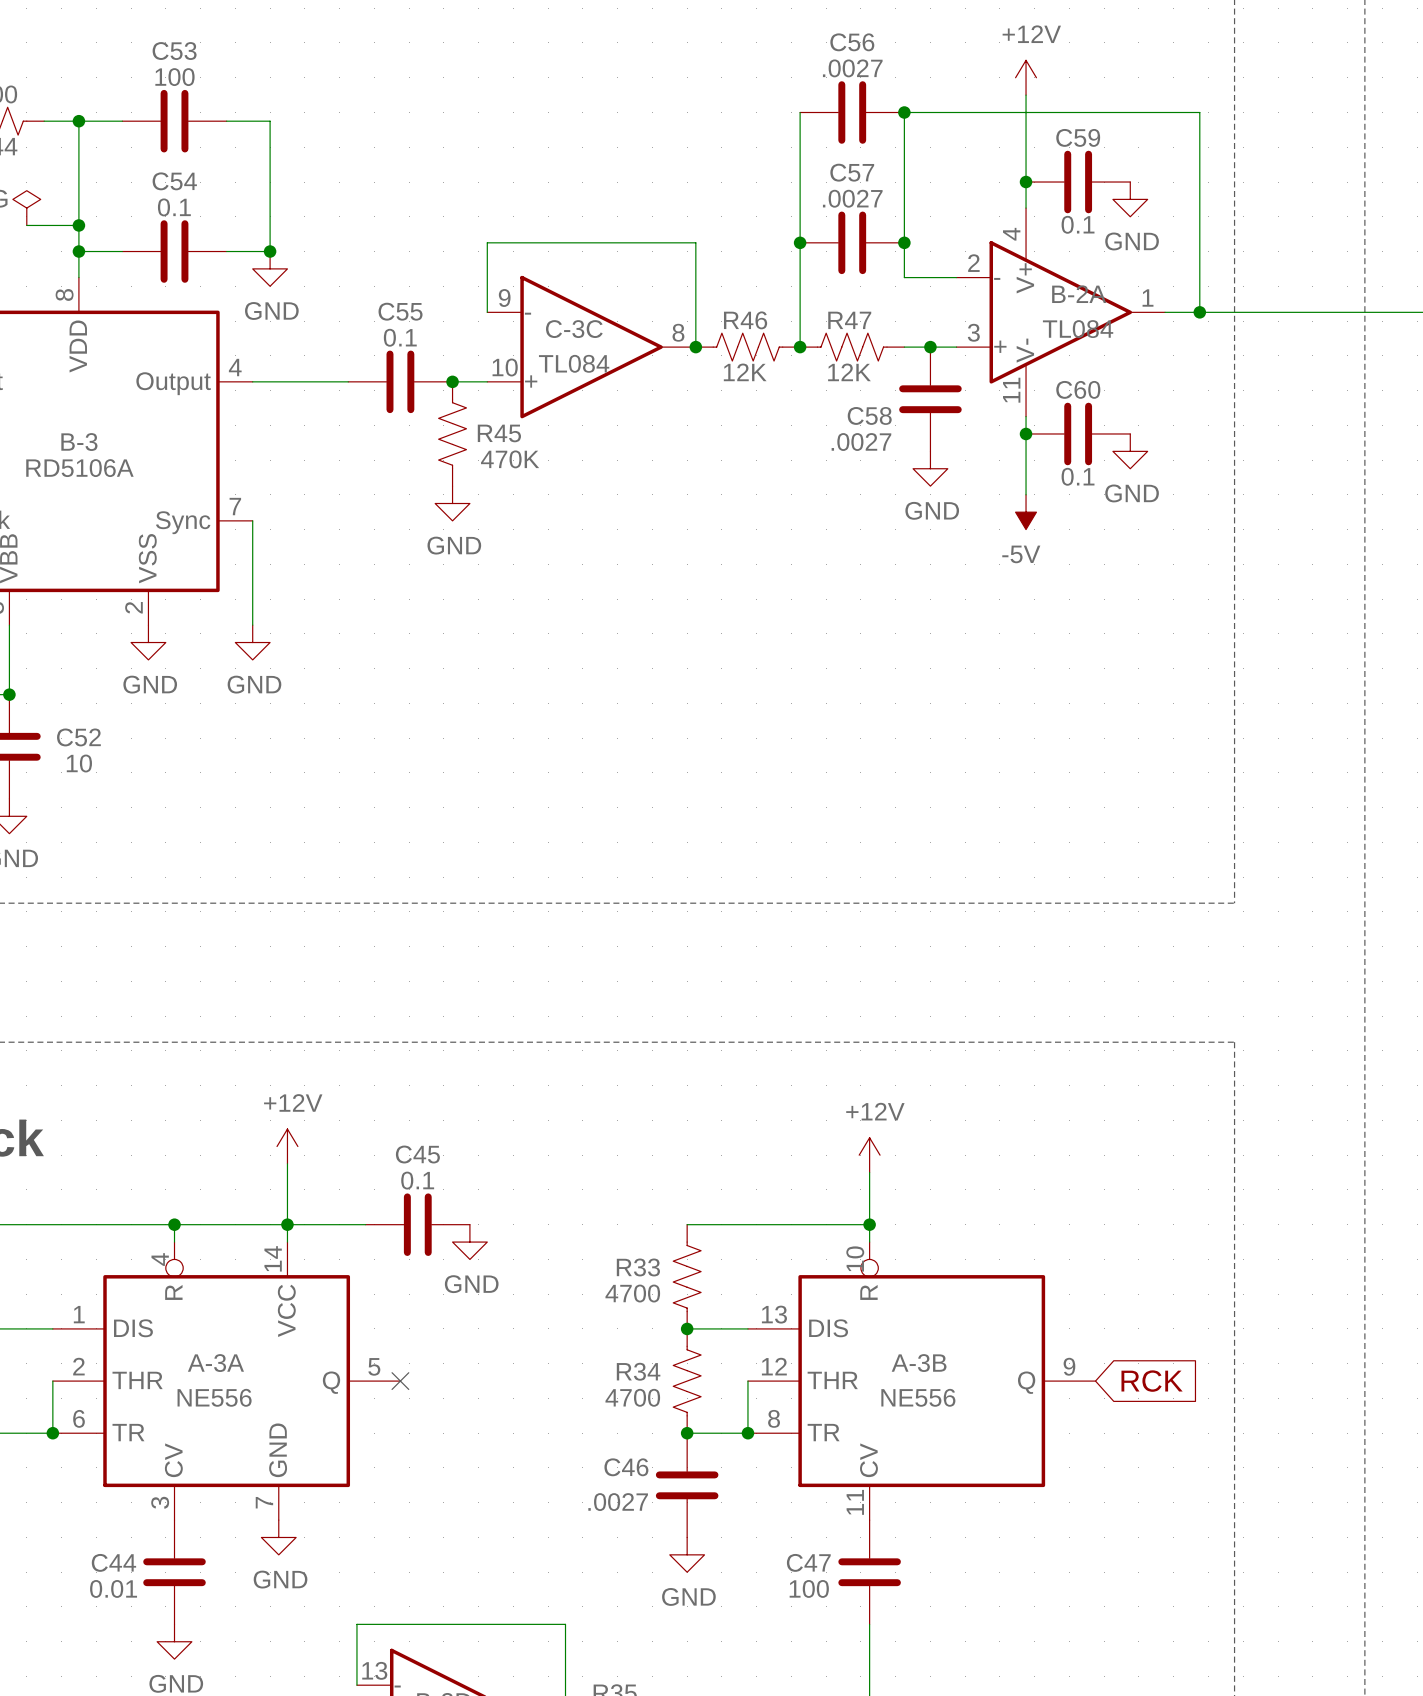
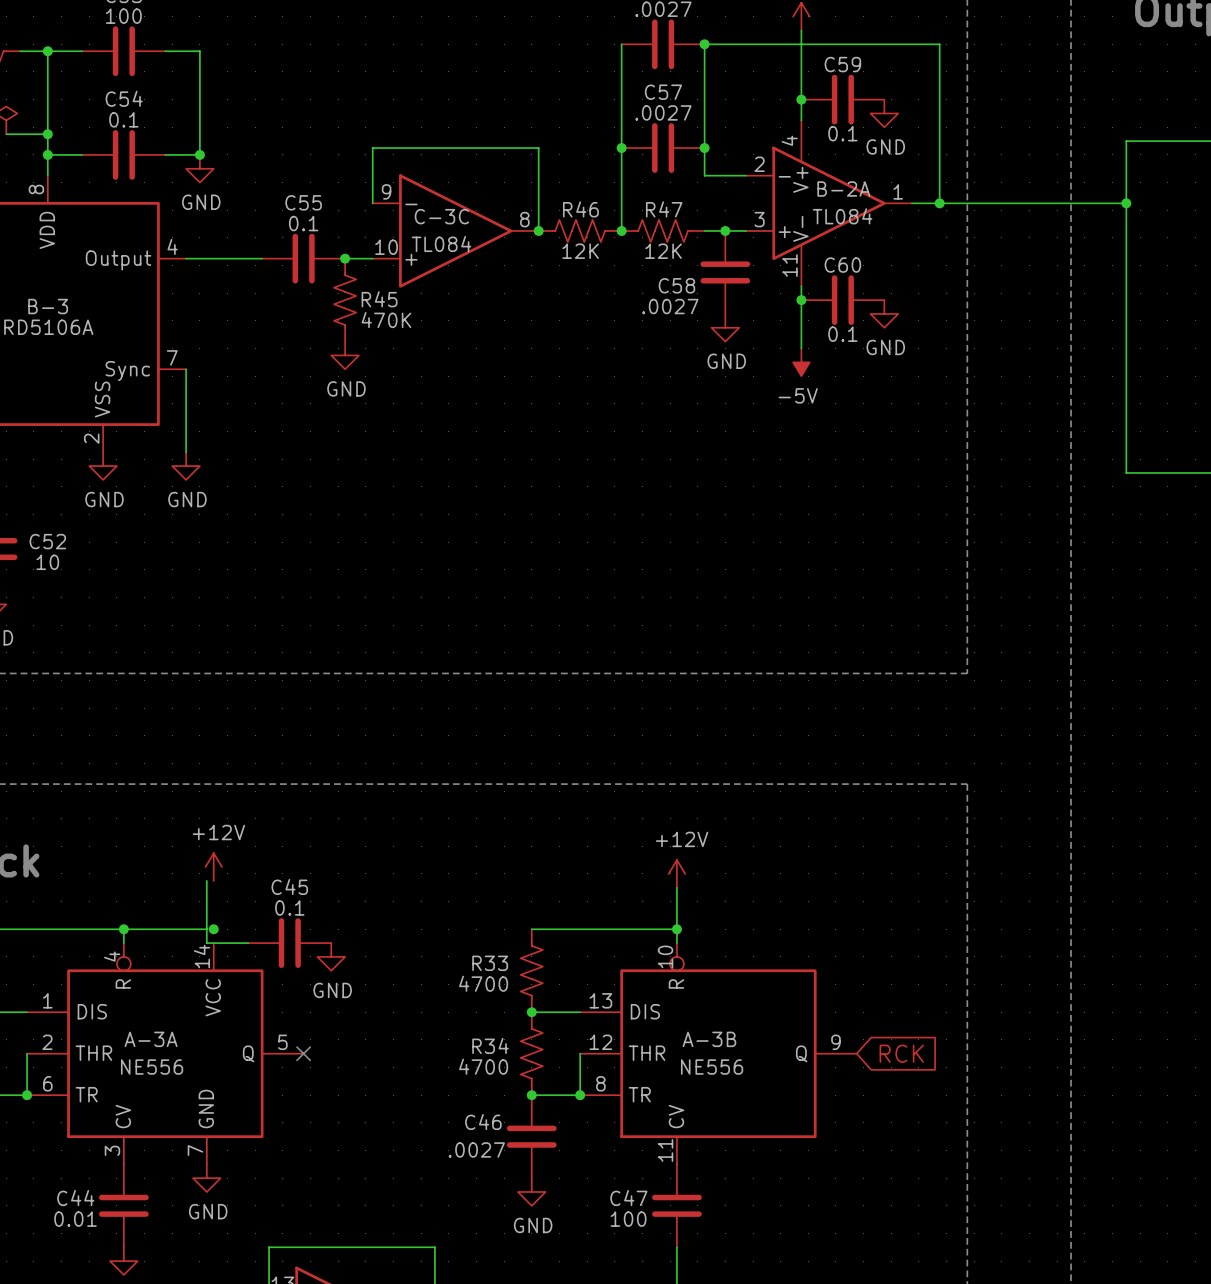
wire: none -> (206, 880) (206, 943) (248, 943)
wire: (287, 1163) (287, 1242) -> none
wire: (278, 1224) (365, 1224) -> none
C45 position: (417, 1224) -> (289, 943)
power symbol position: GND (469, 1242) -> GND (331, 956)

